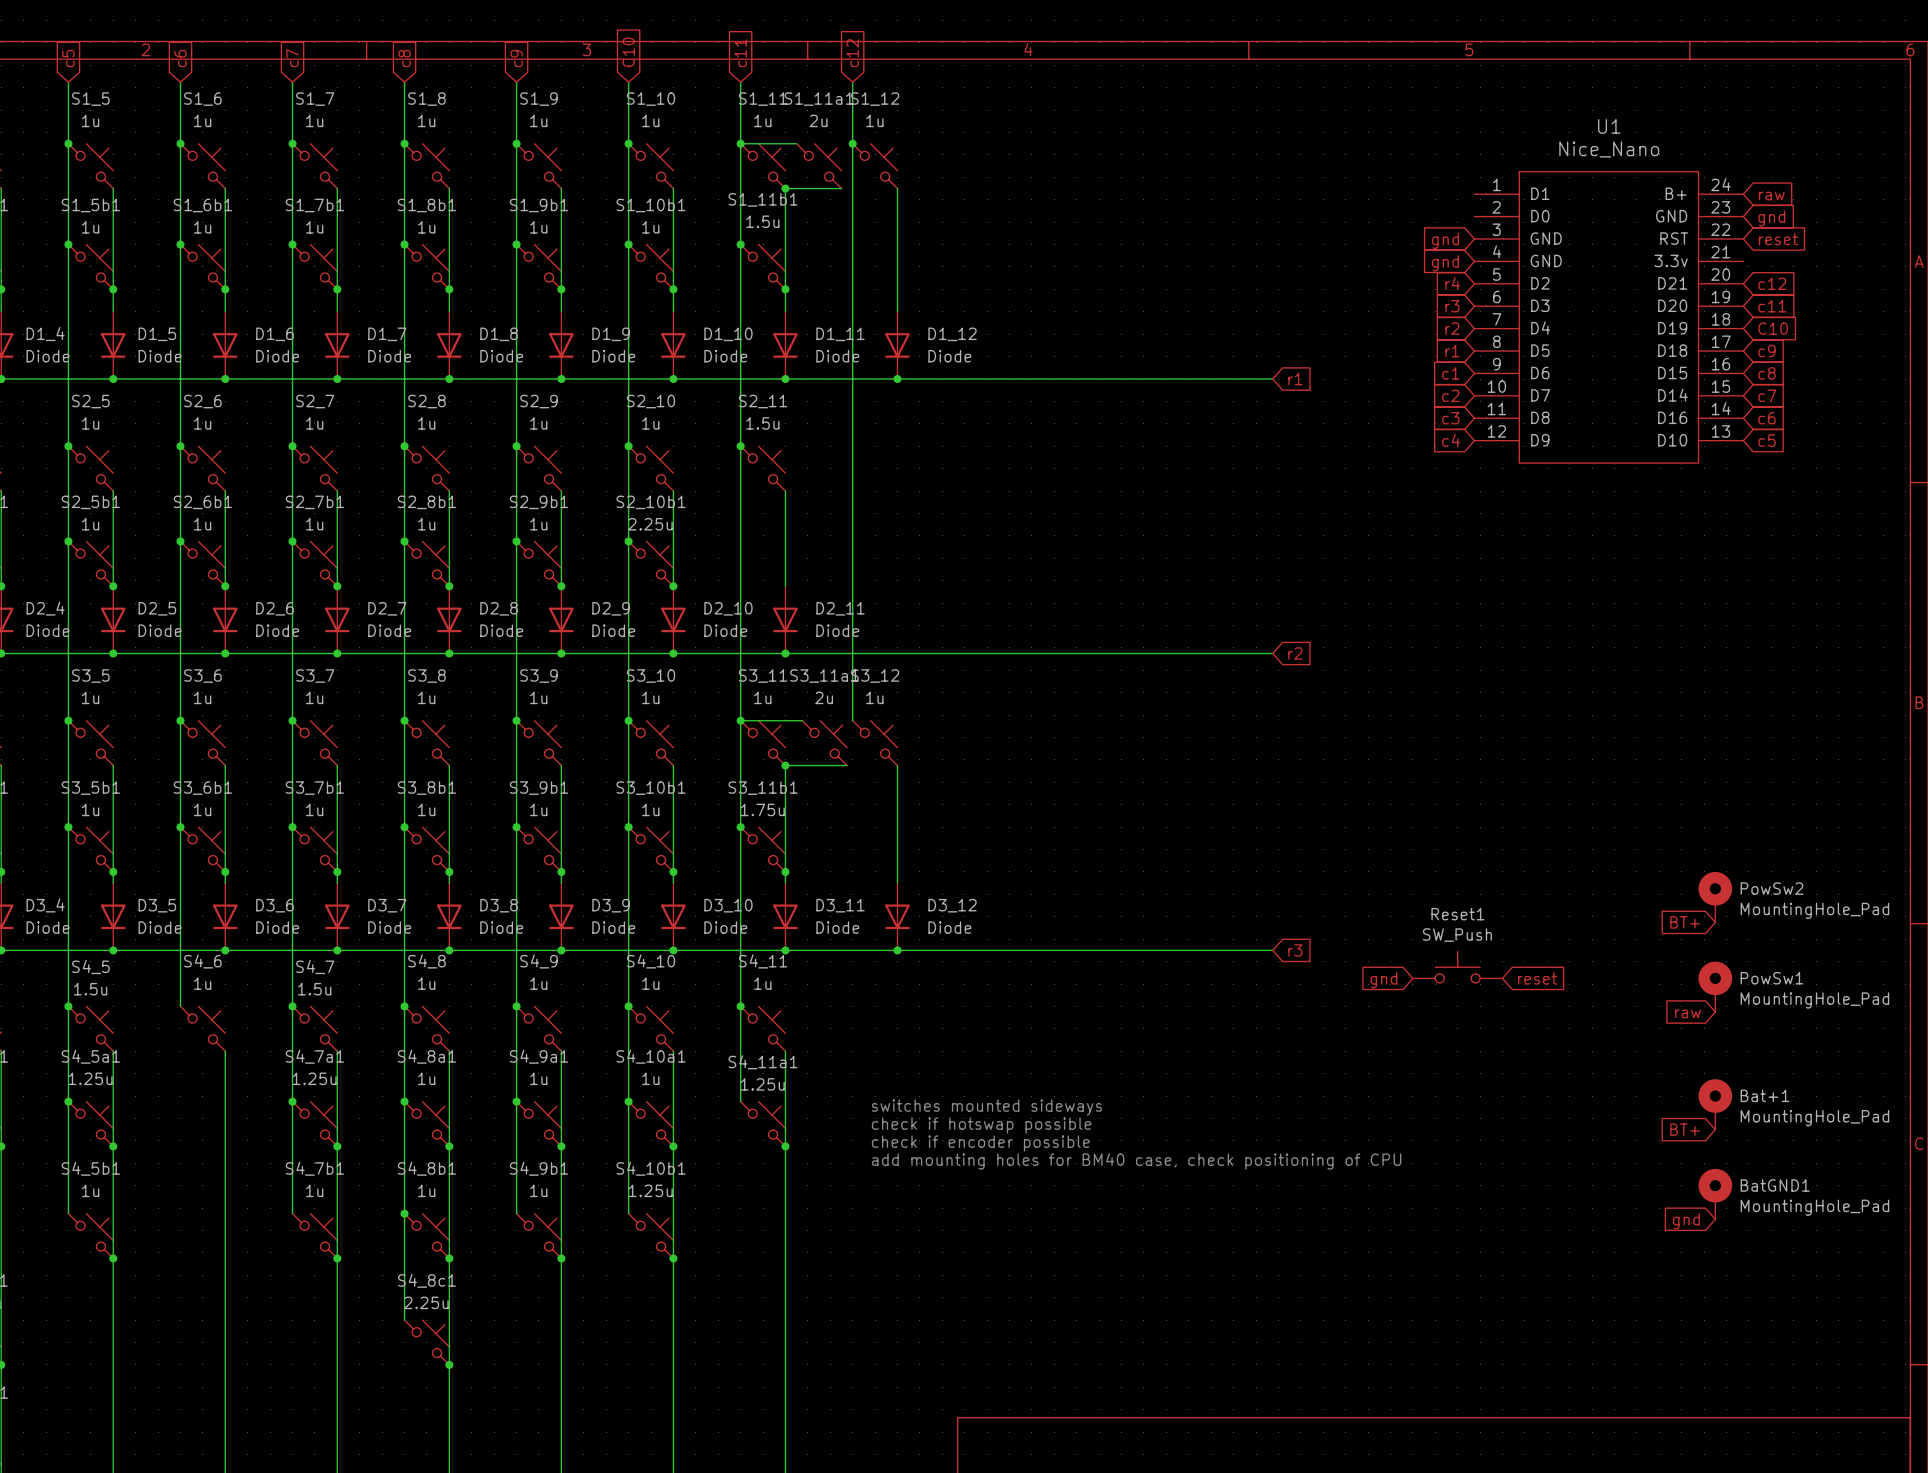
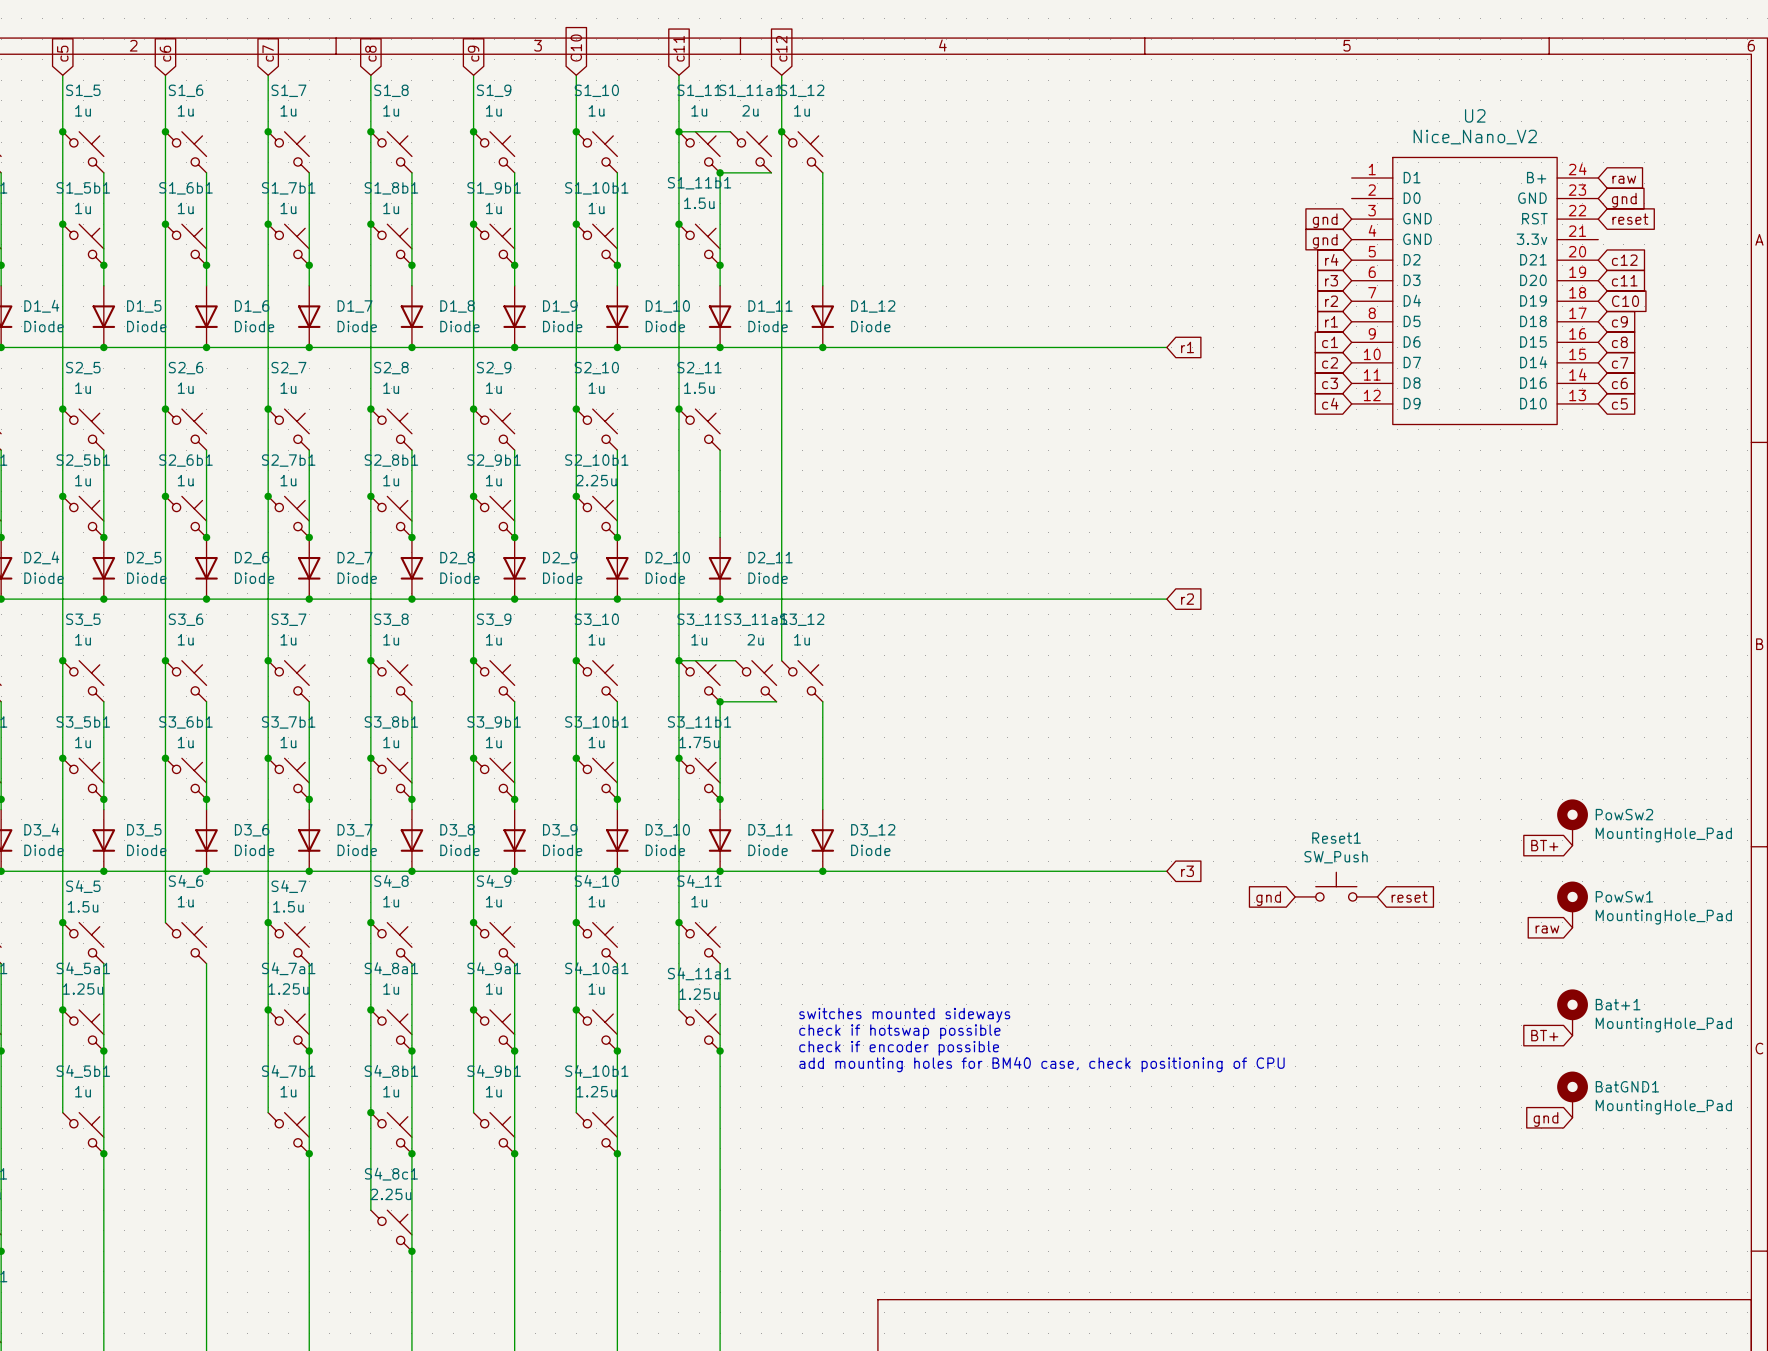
U1 name: U1 (1609, 126) -> U2 (1475, 115)
U1 value: Nice_Nano (1609, 149) -> Nice_Nano_V2 (1475, 137)

